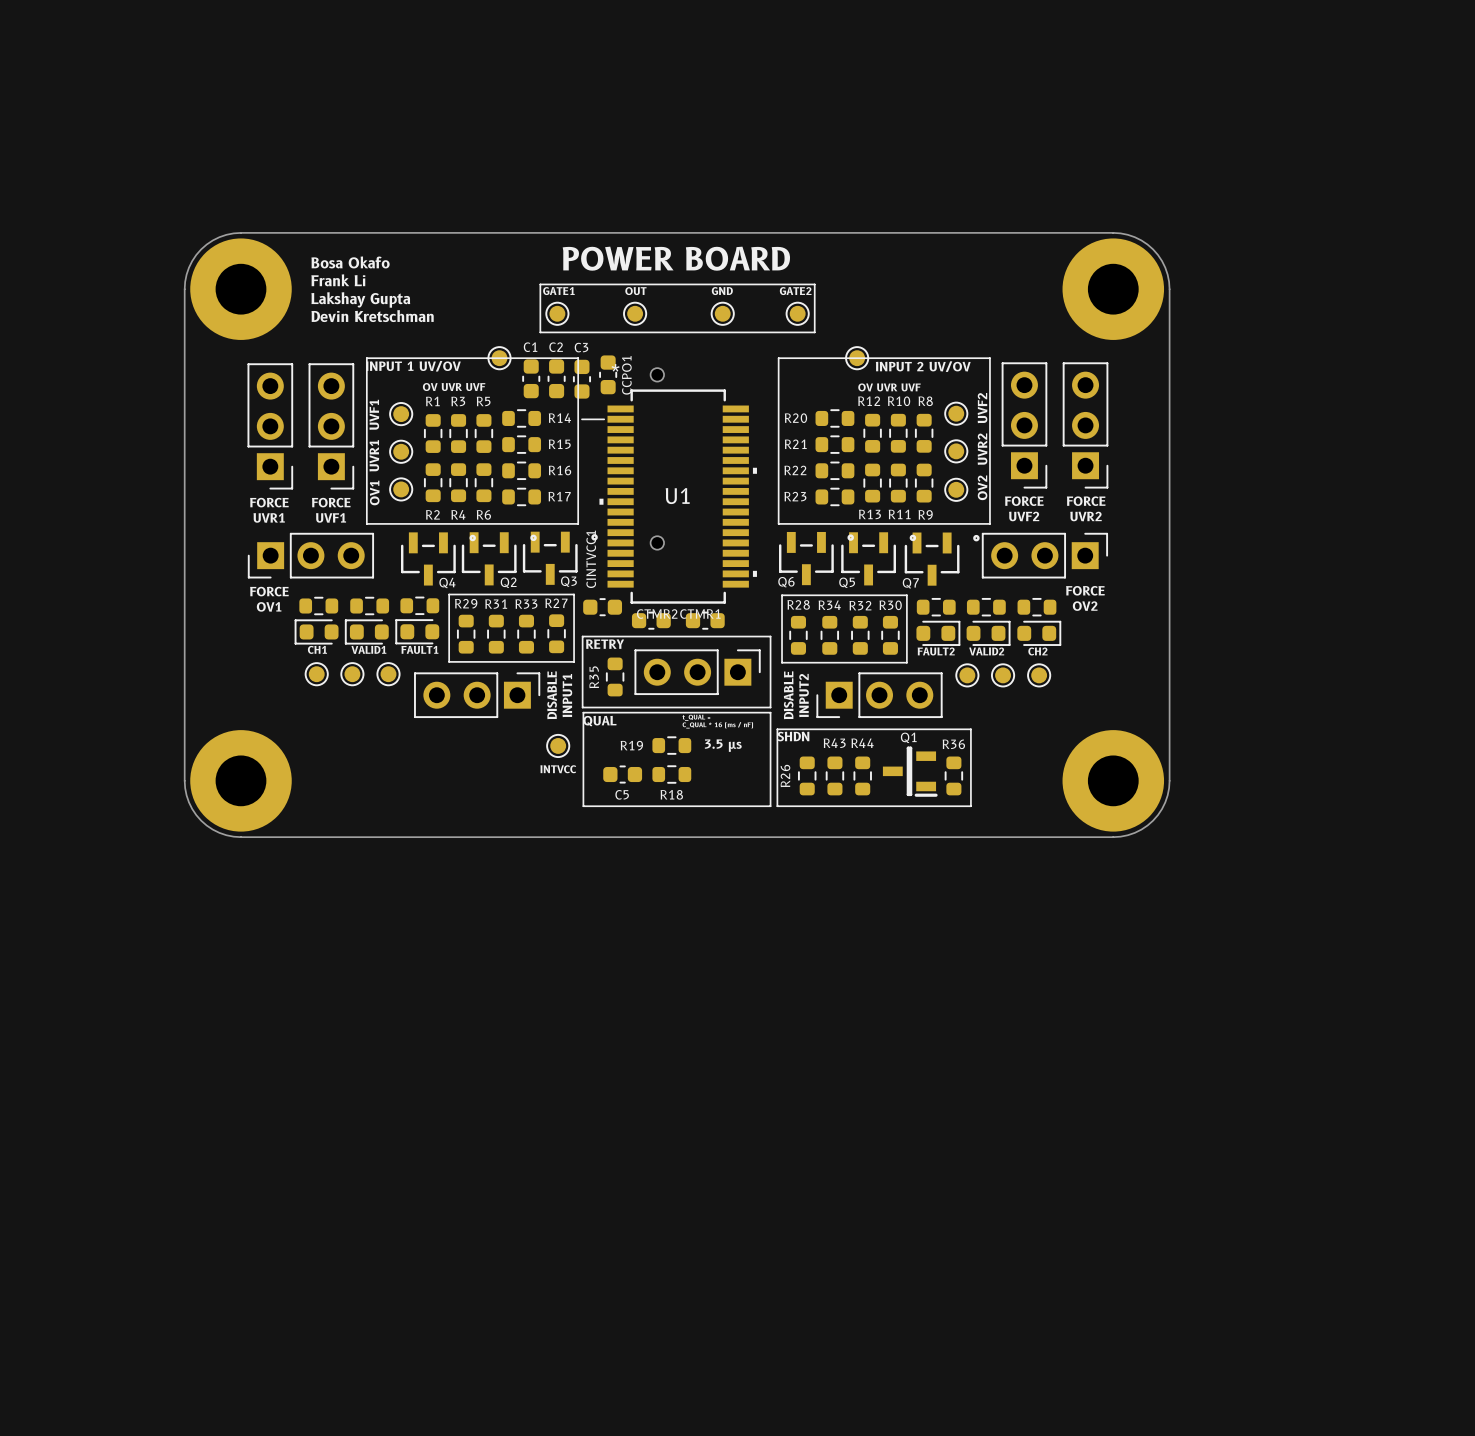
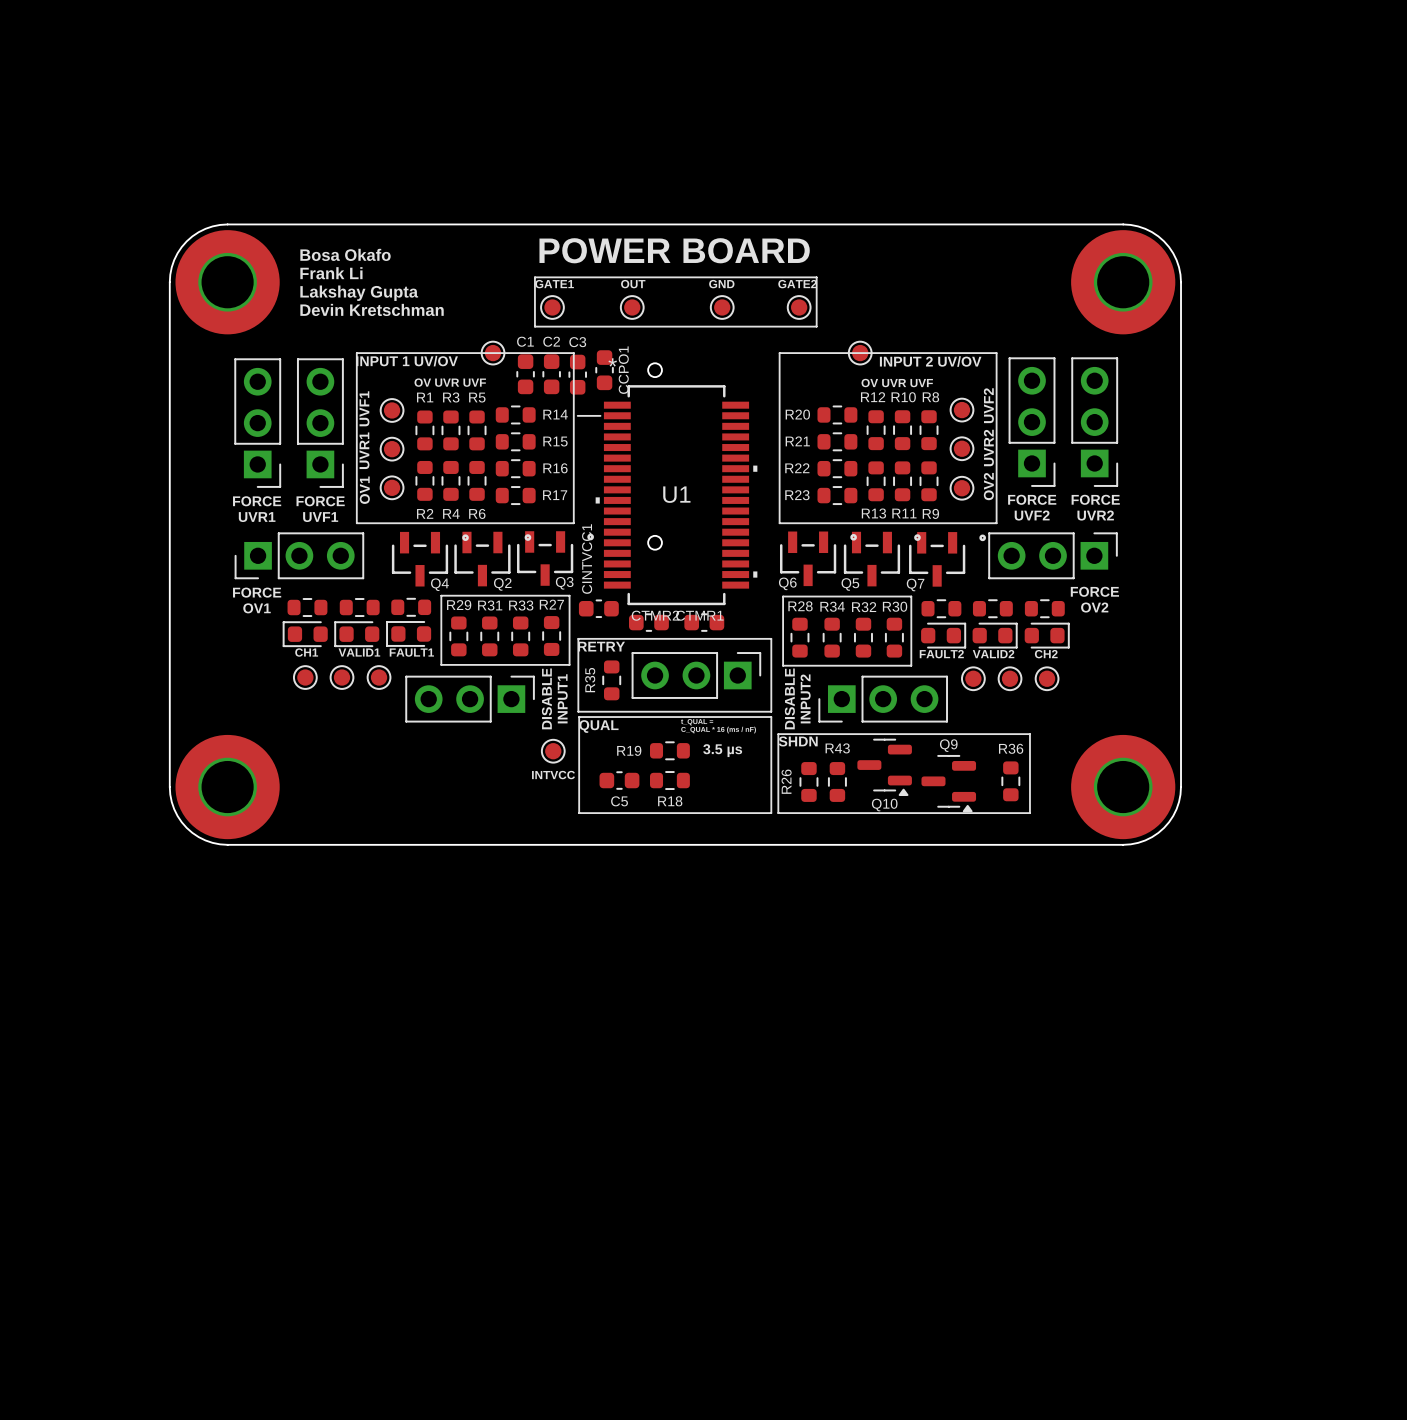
line: (970, 729) (970, 806) -> (977, 734) (1029, 734) (1029, 813) (977, 813)
Q10: none -> (884, 767)
Q1: (910, 771) -> none
R44: (862, 775) -> none
R36 position: (953, 775) -> (1010, 781)
Q9: none -> (948, 783)

